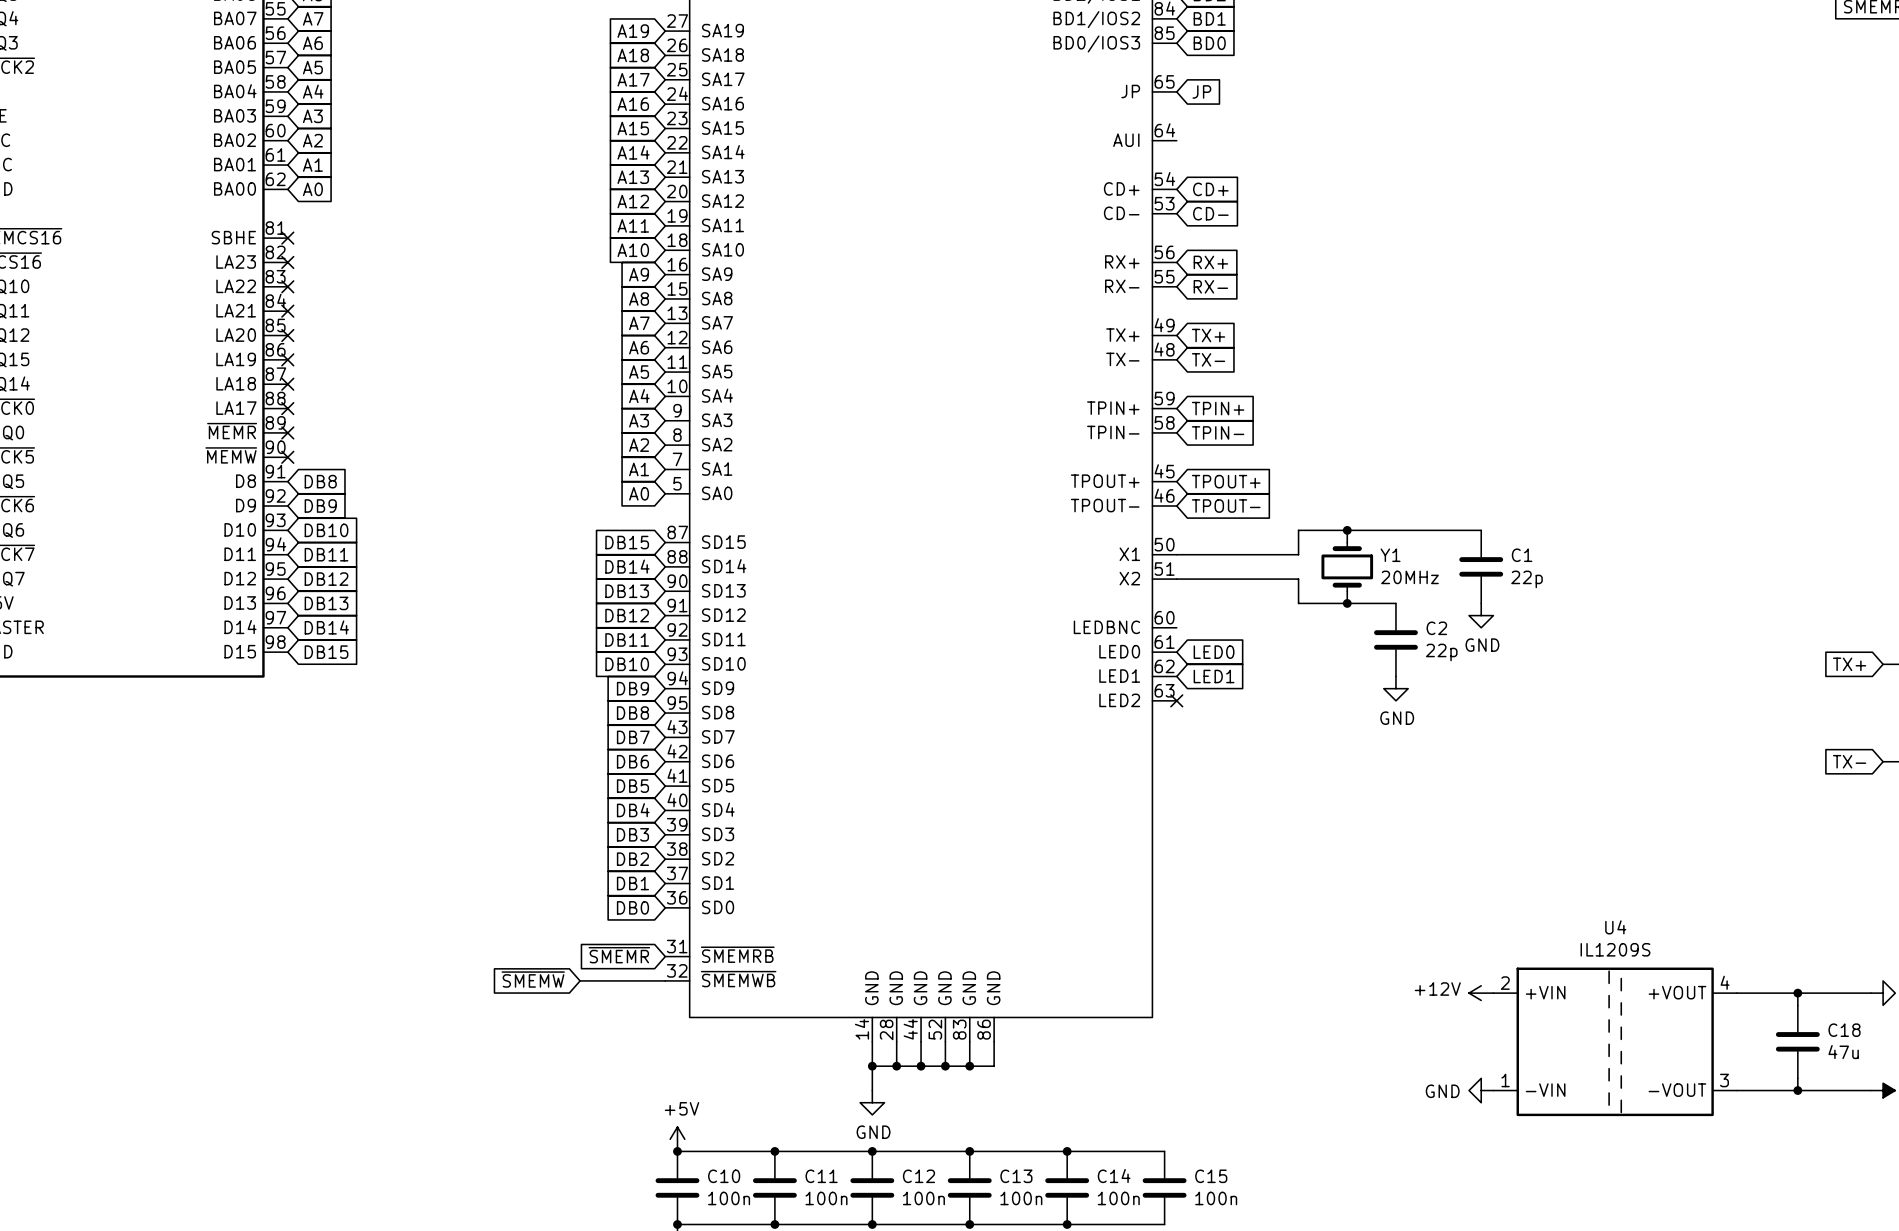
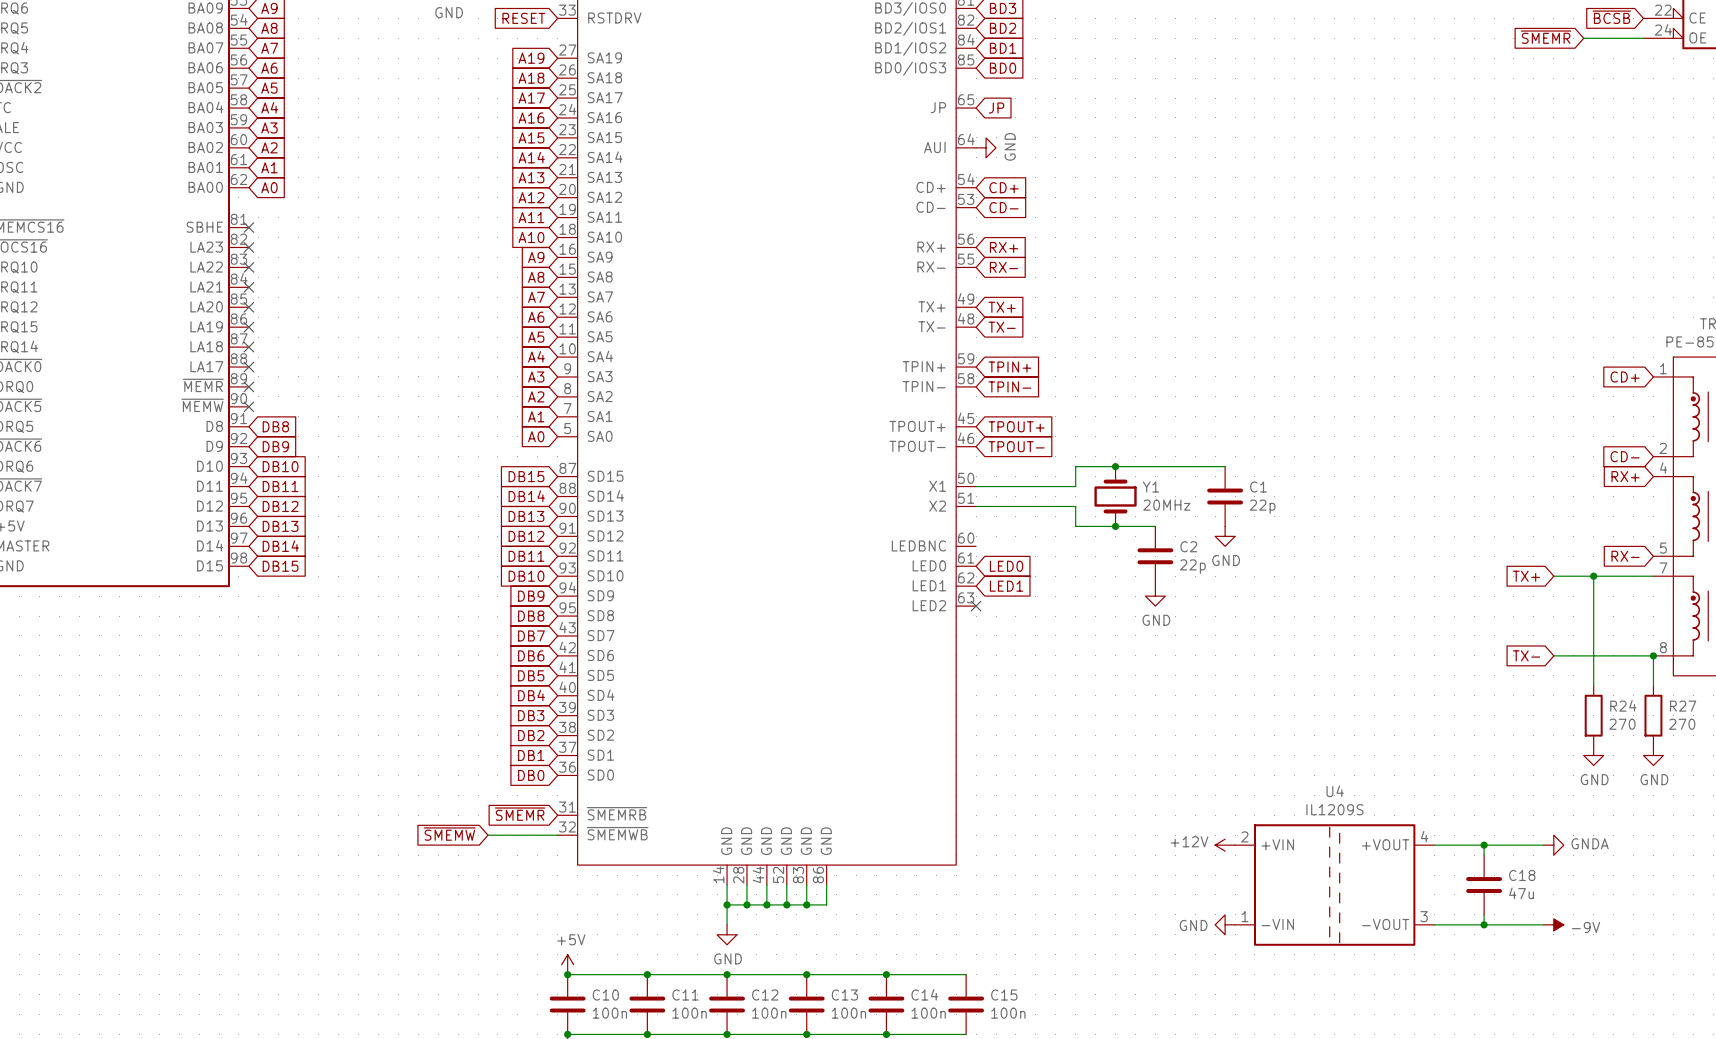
power symbol: none -> GND (986, 147)

